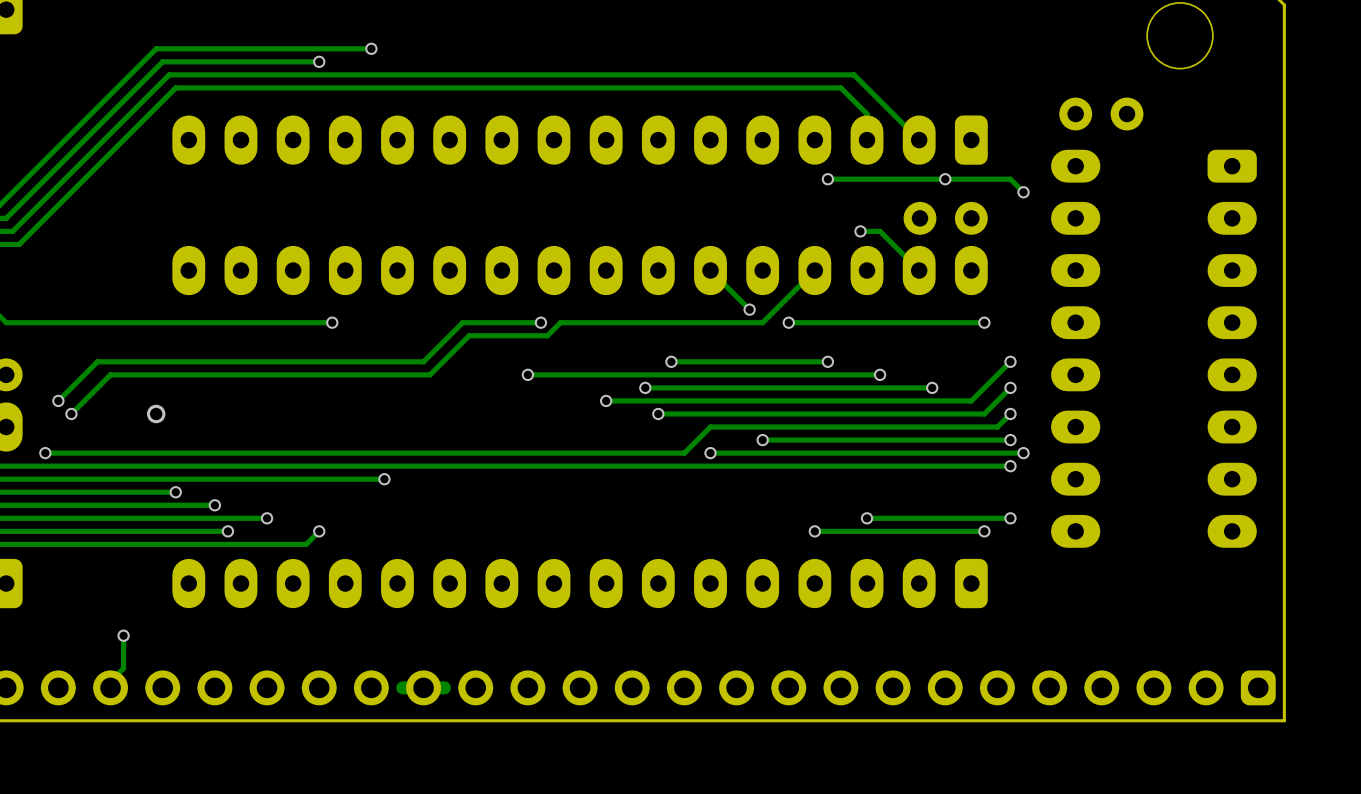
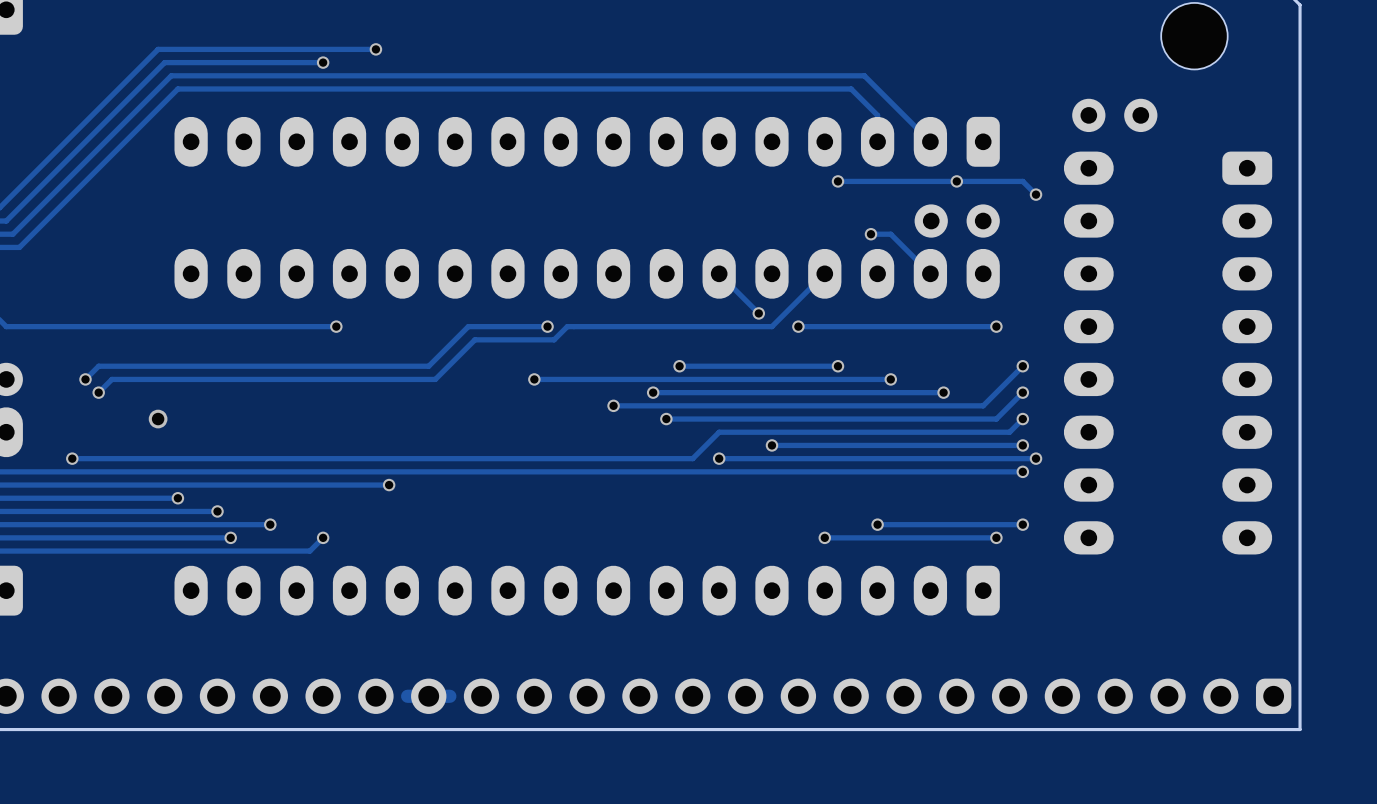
track: (84, 374) (58, 400) -> none
via: none -> (85, 379)
track: (97, 387) (71, 413) -> none
via: none -> (98, 392)
via: (58, 400) -> none
via: (71, 413) -> none
via: (45, 453) -> none
track: (71, 453) (45, 453) -> none
via: none -> (72, 458)
track: (123, 635) (123, 668) (110, 681) -> none
via: (123, 635) -> none

